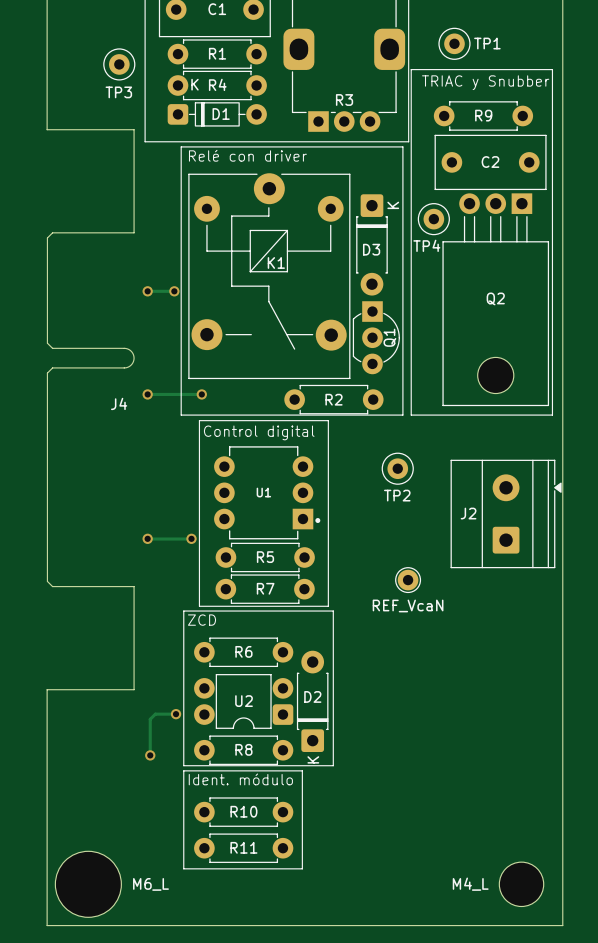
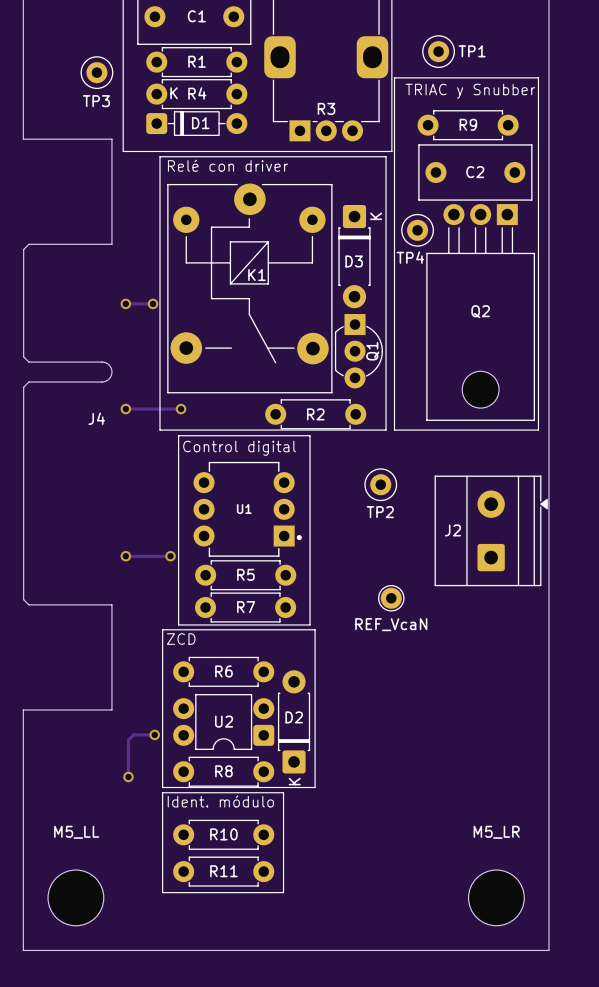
M5_LL: none -> (75, 897)
M5_LR: none -> (496, 897)
M6_L: (88, 884) -> none
M4_L: (521, 884) -> none

